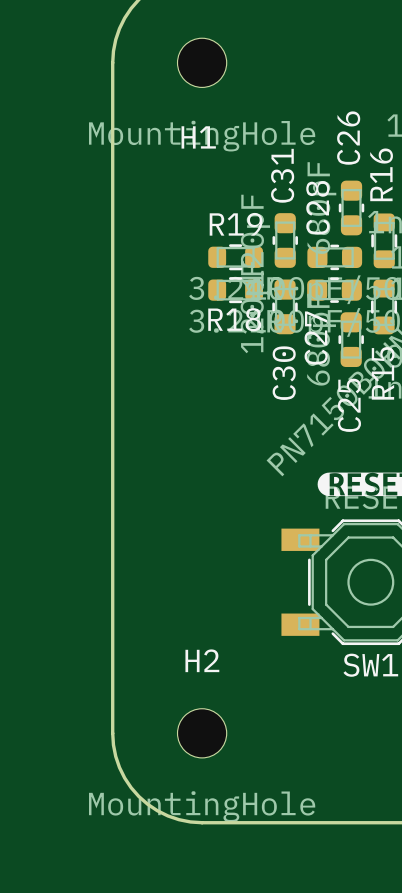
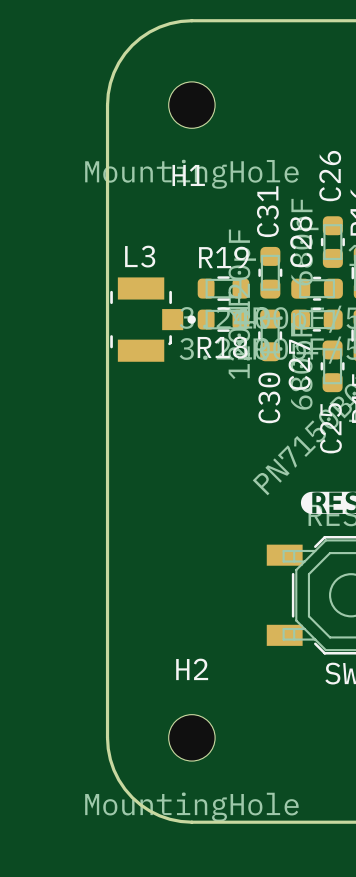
L3: none -> (153, 319)

